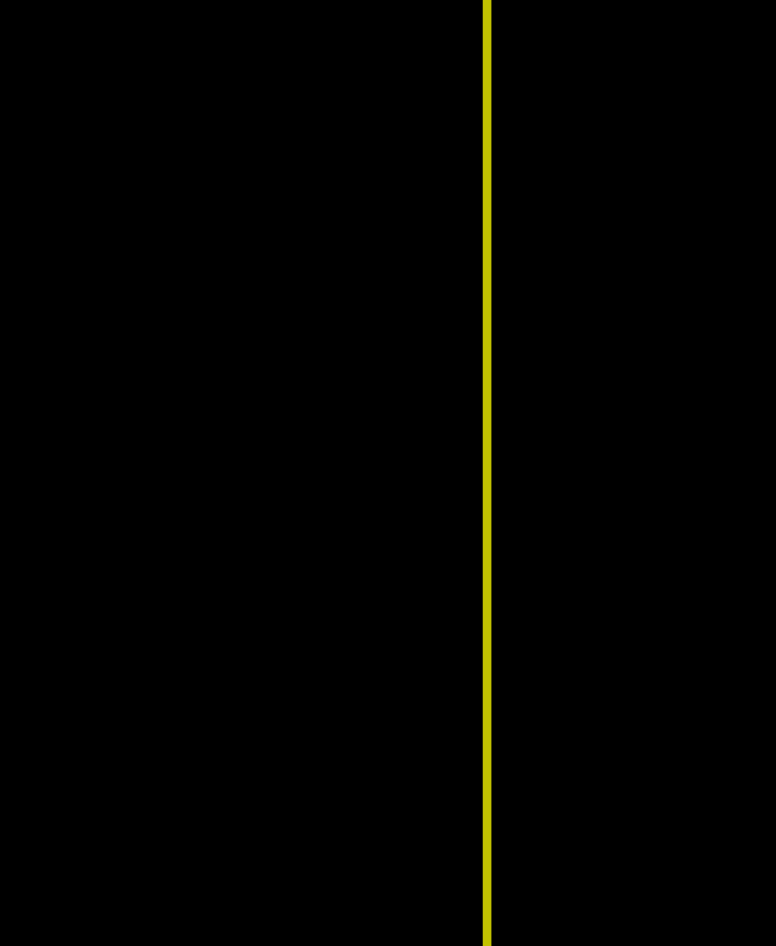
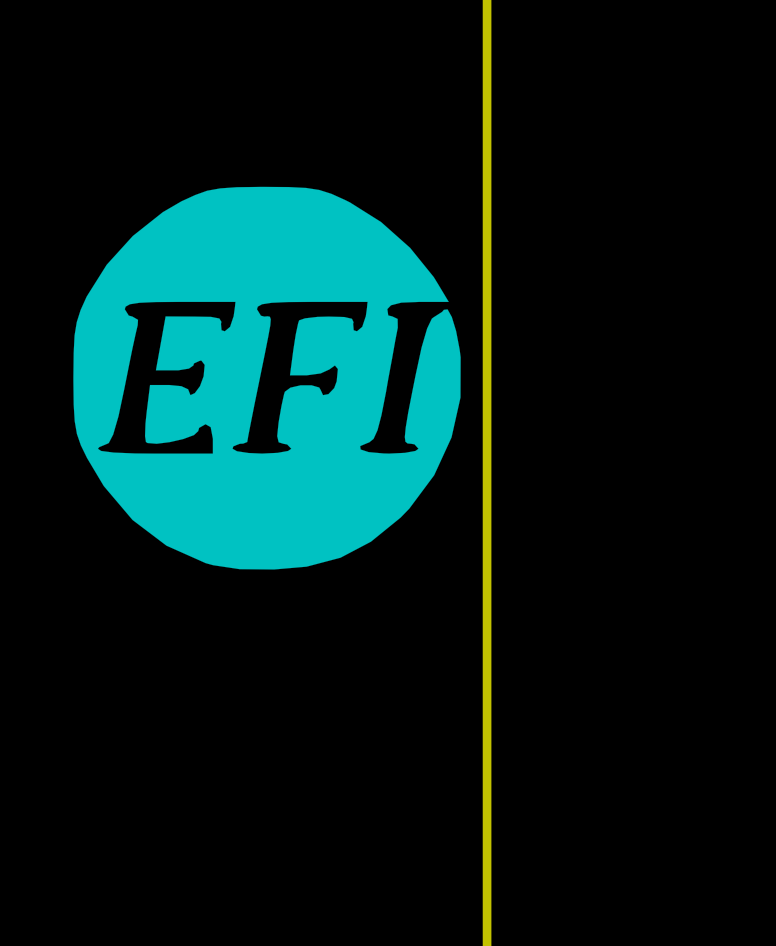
drawing: none -> [73, 186, 461, 570]

